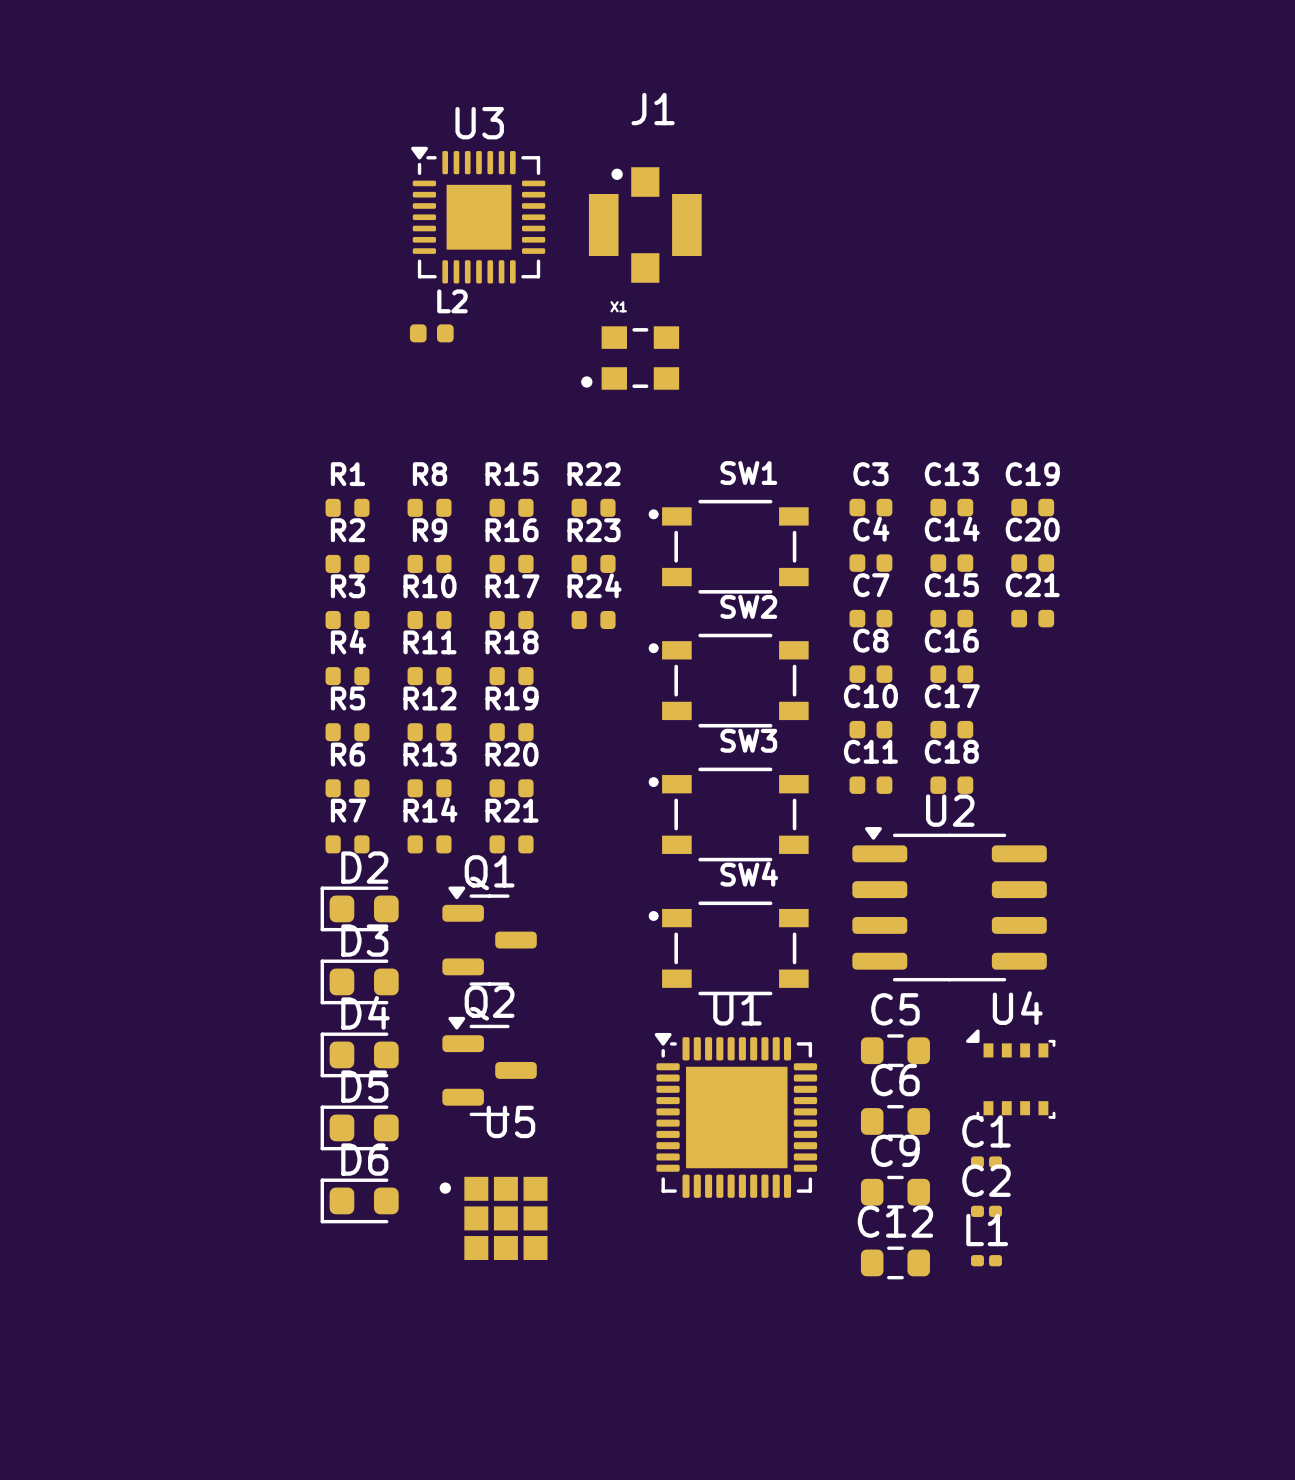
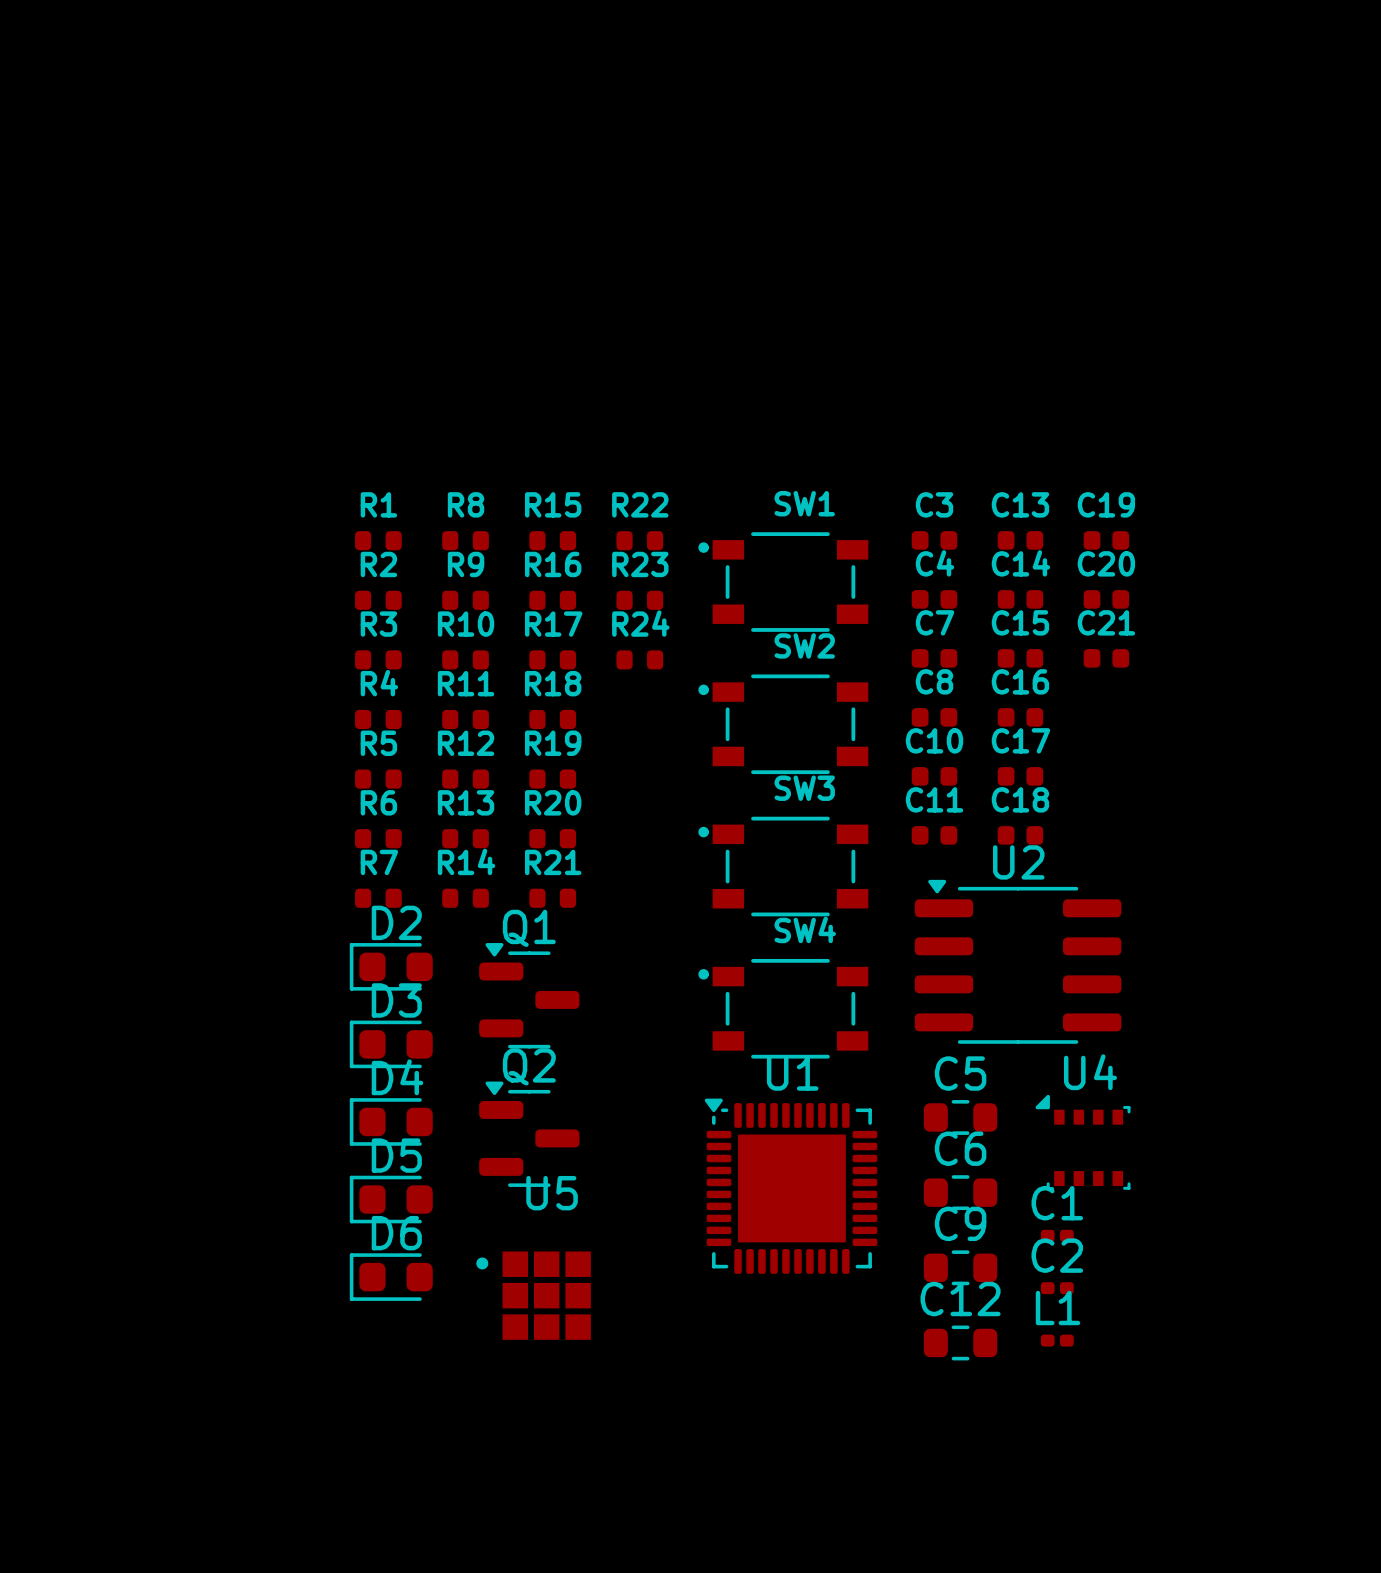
U3: (478, 215) -> none
J1: (645, 224) -> none
L2: (431, 333) -> none
X1: (630, 358) -> none

